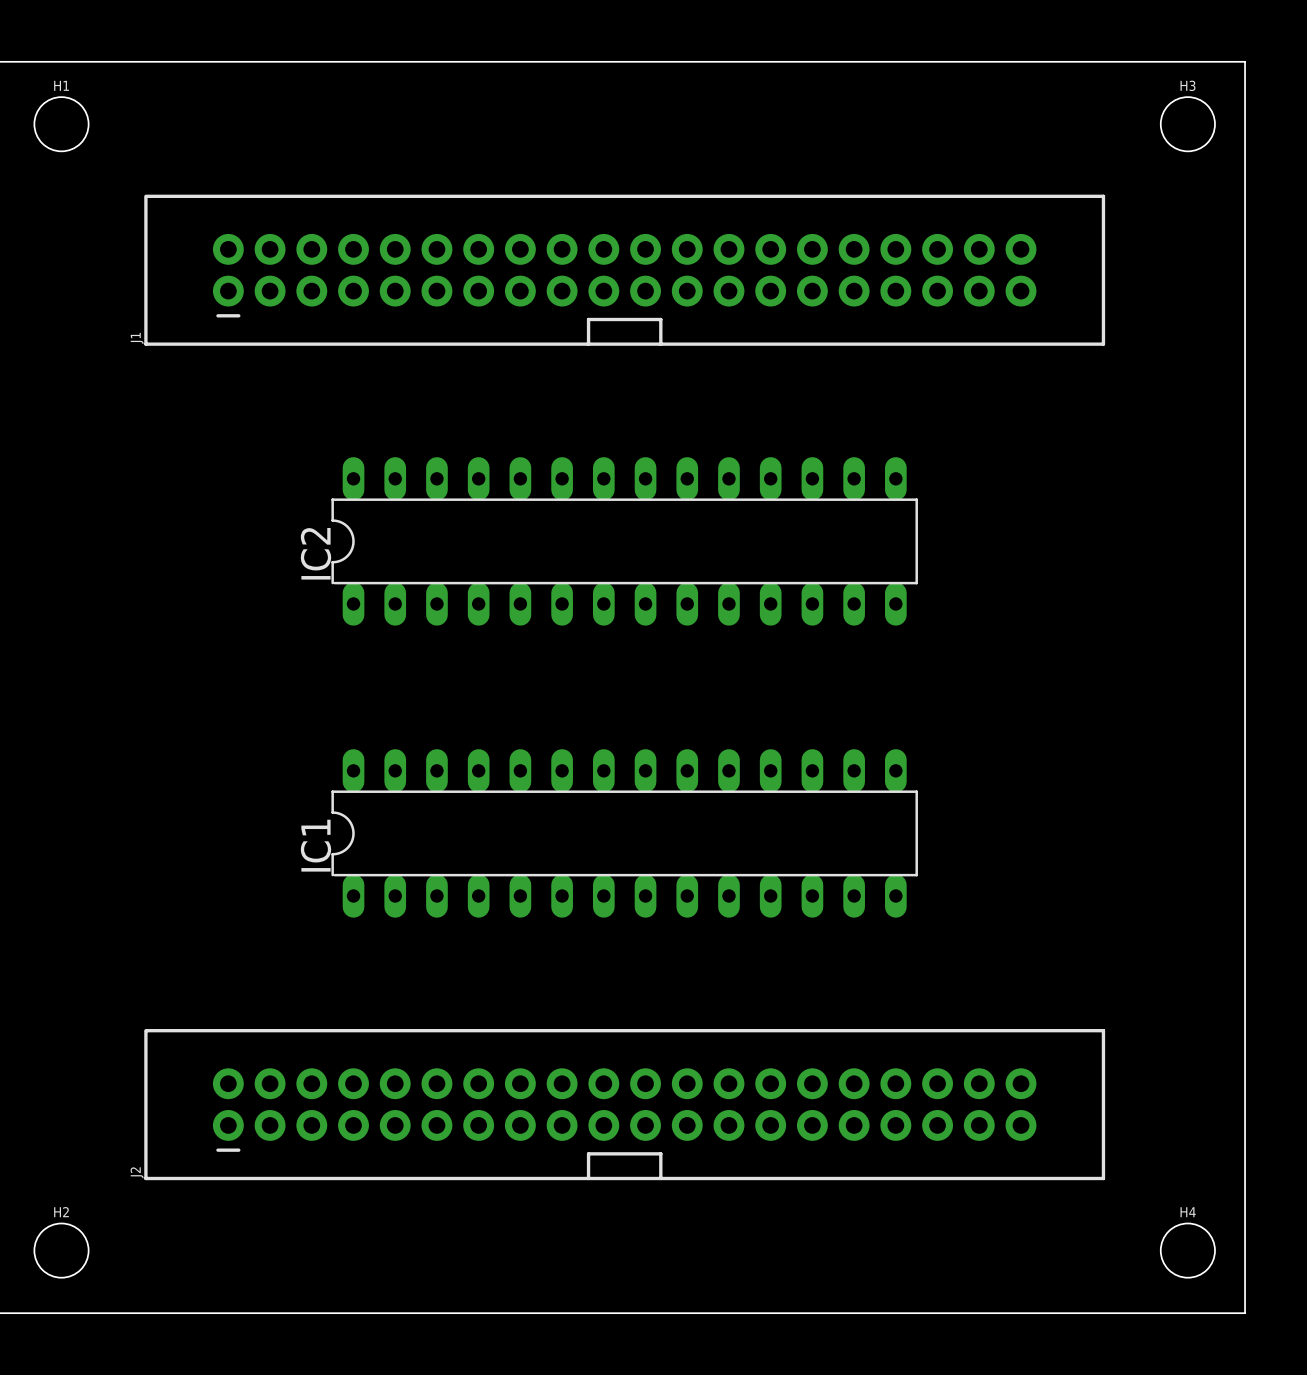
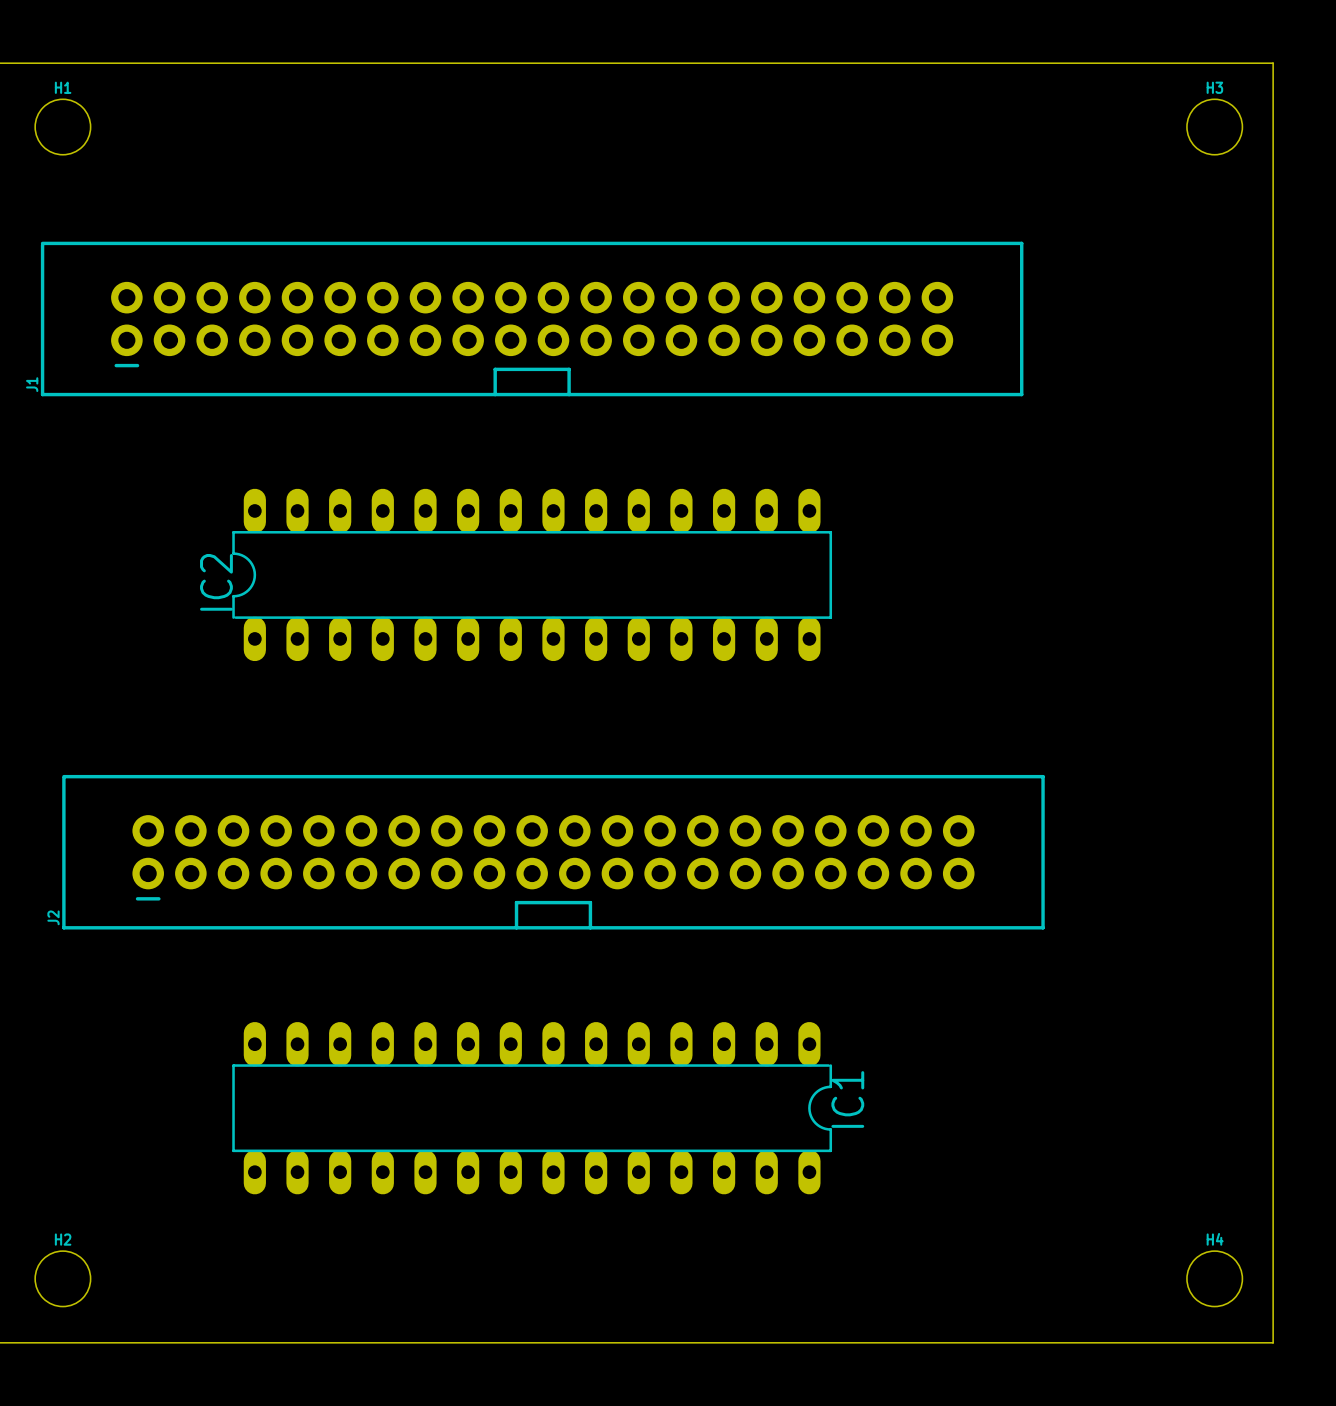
J1 position: (624, 270) -> (532, 318)
IC2 position: (624, 541) -> (532, 574)
IC1 rotation: 0° (624, 833) -> 180° (532, 1108)
J2 position: (624, 1104) -> (553, 852)

